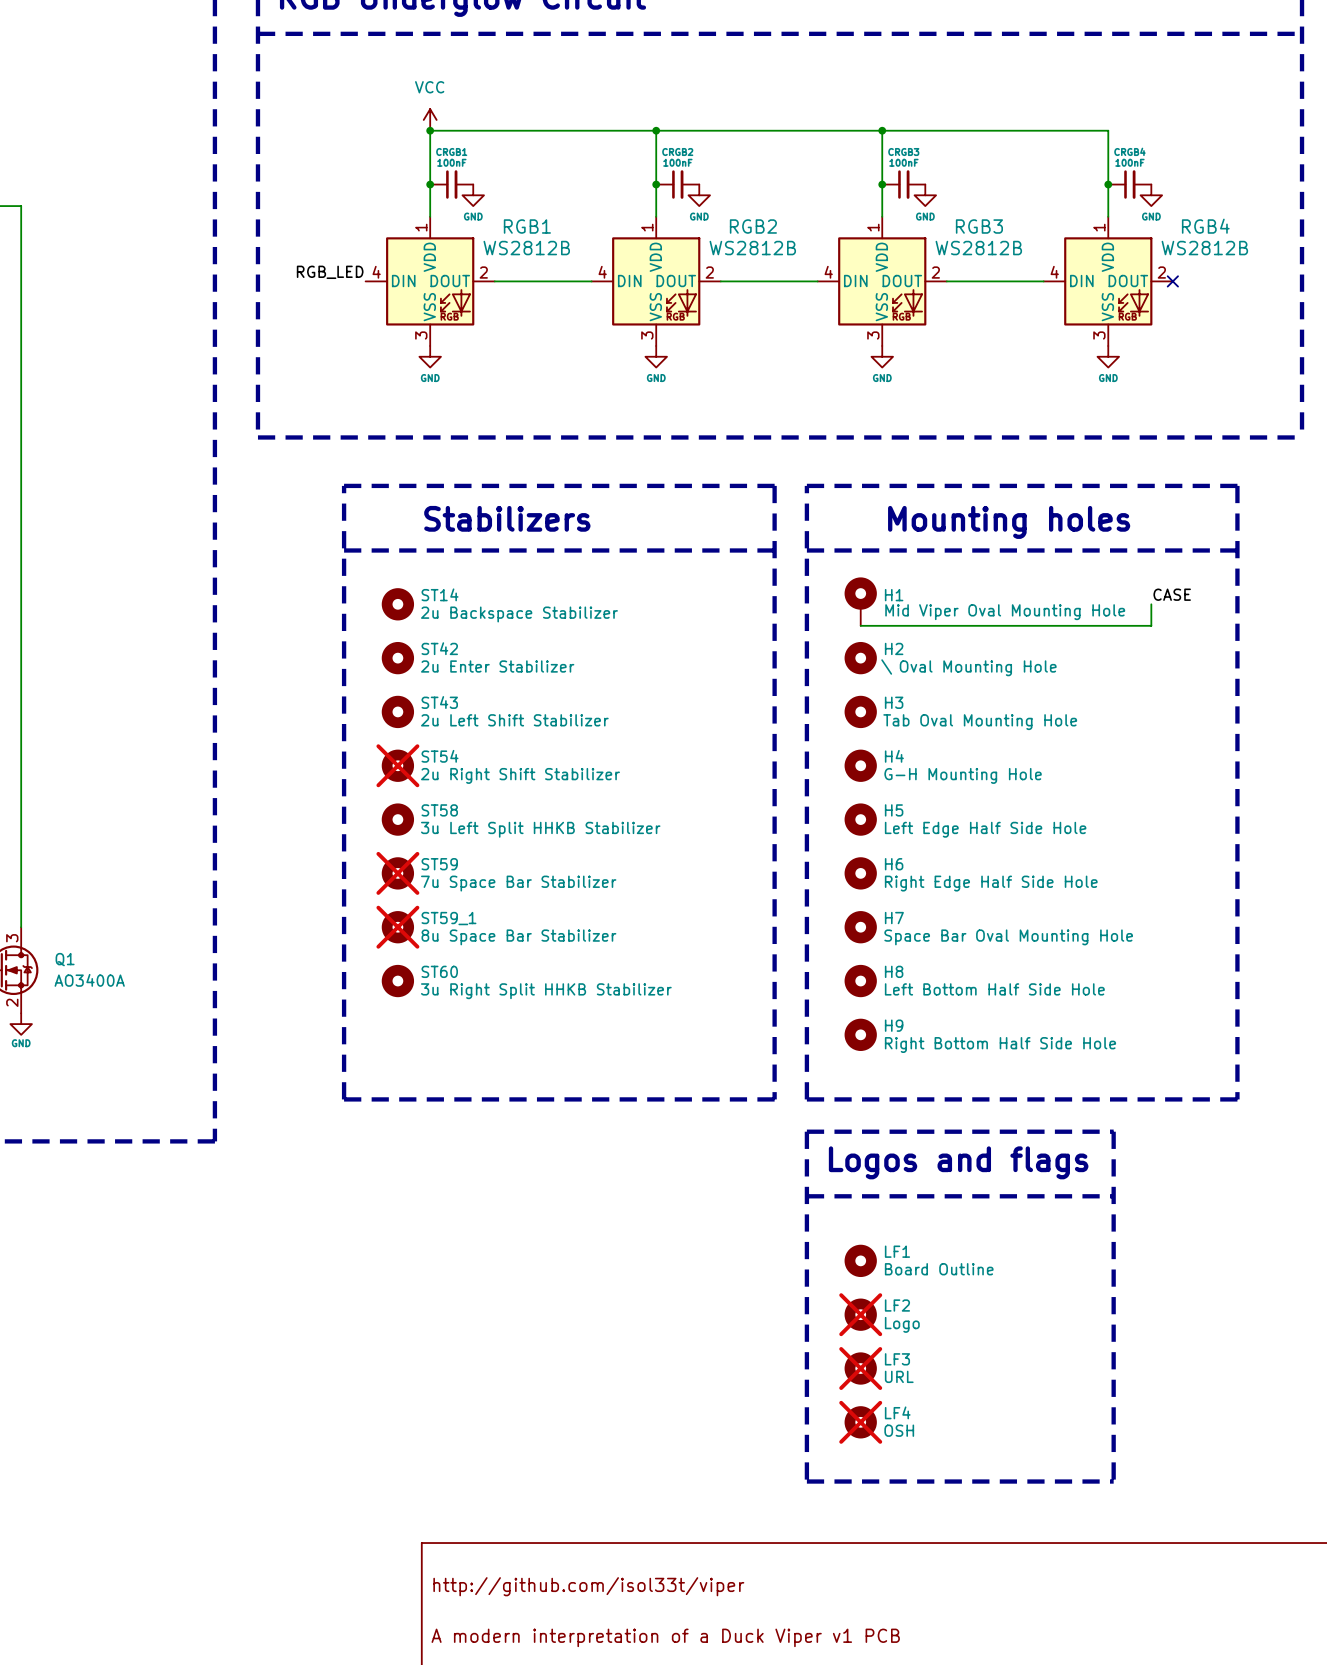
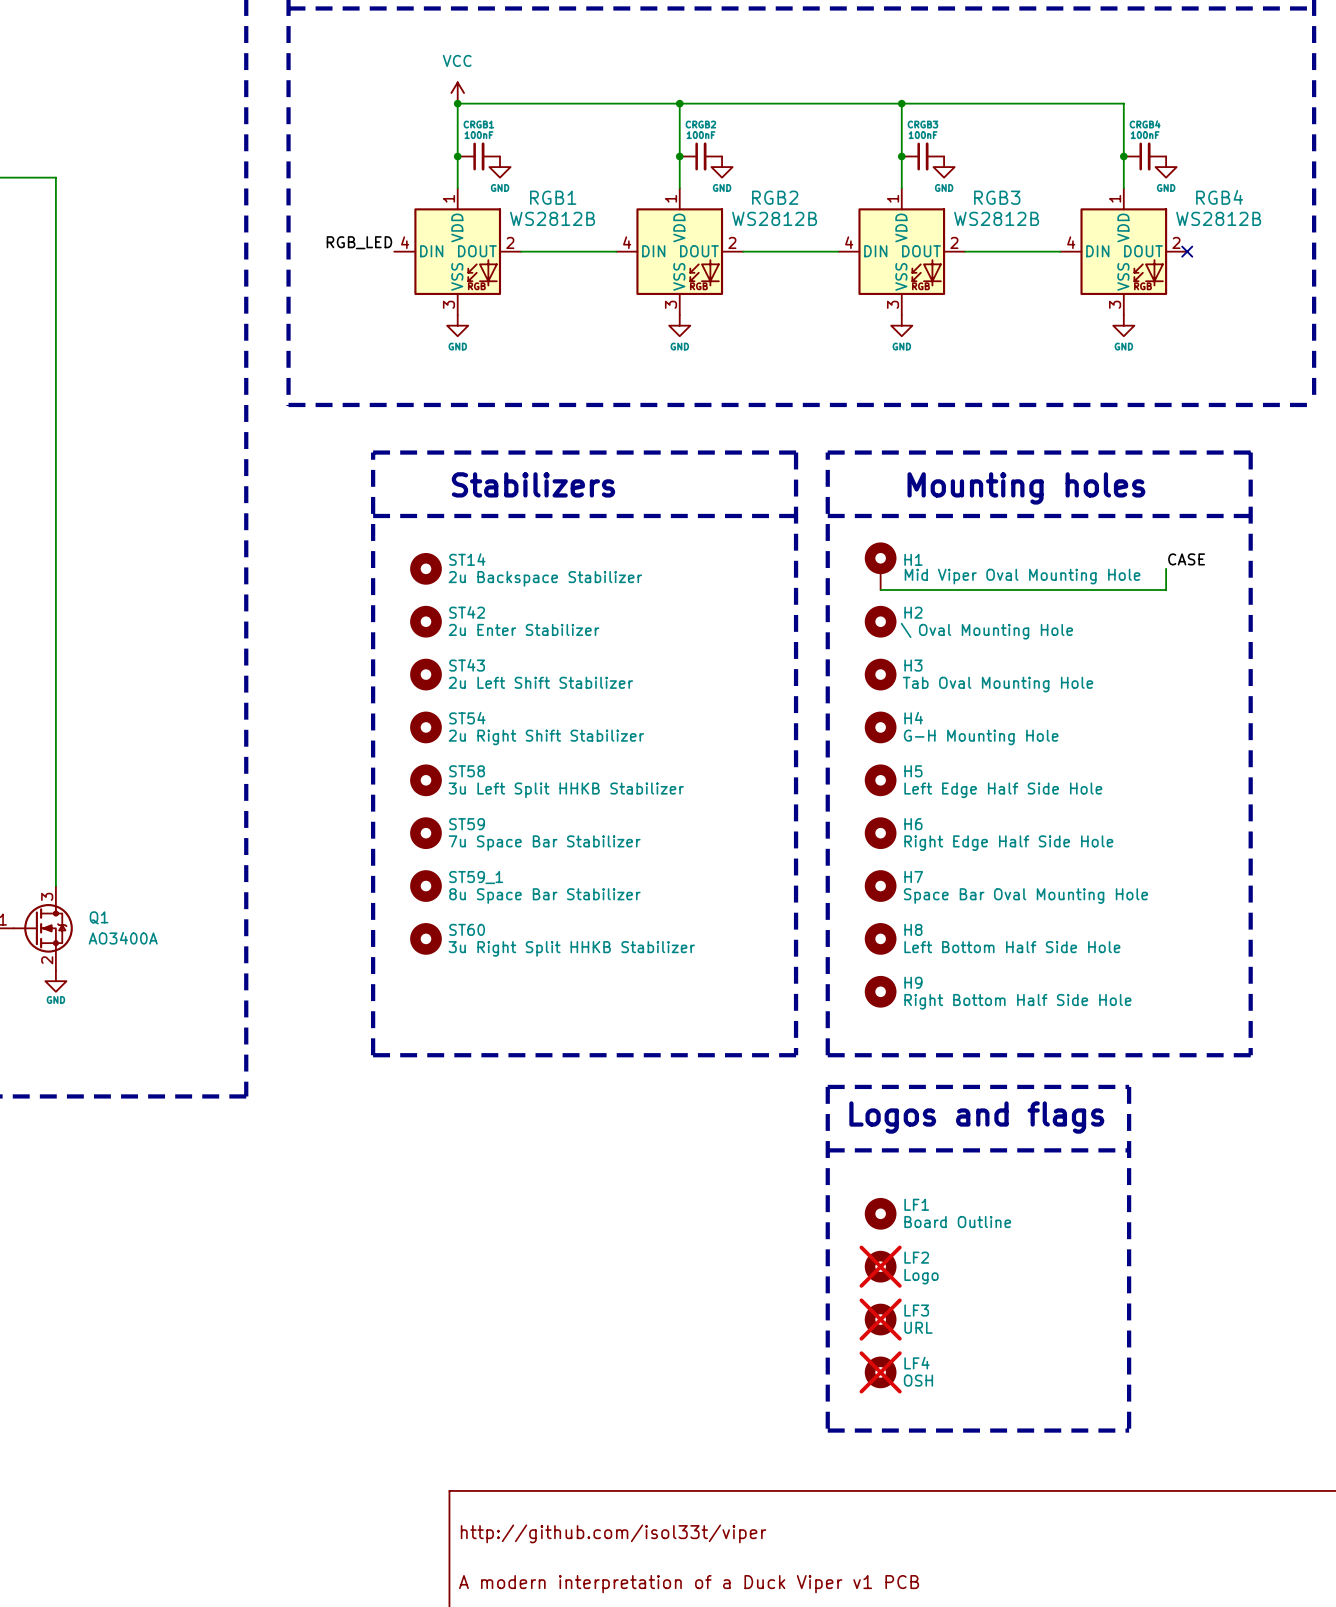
ST54 do-not-place cross: (397, 765) -> none
ST59 do-not-place cross: (397, 873) -> none
ST59_1 do-not-place cross: (397, 927) -> none

